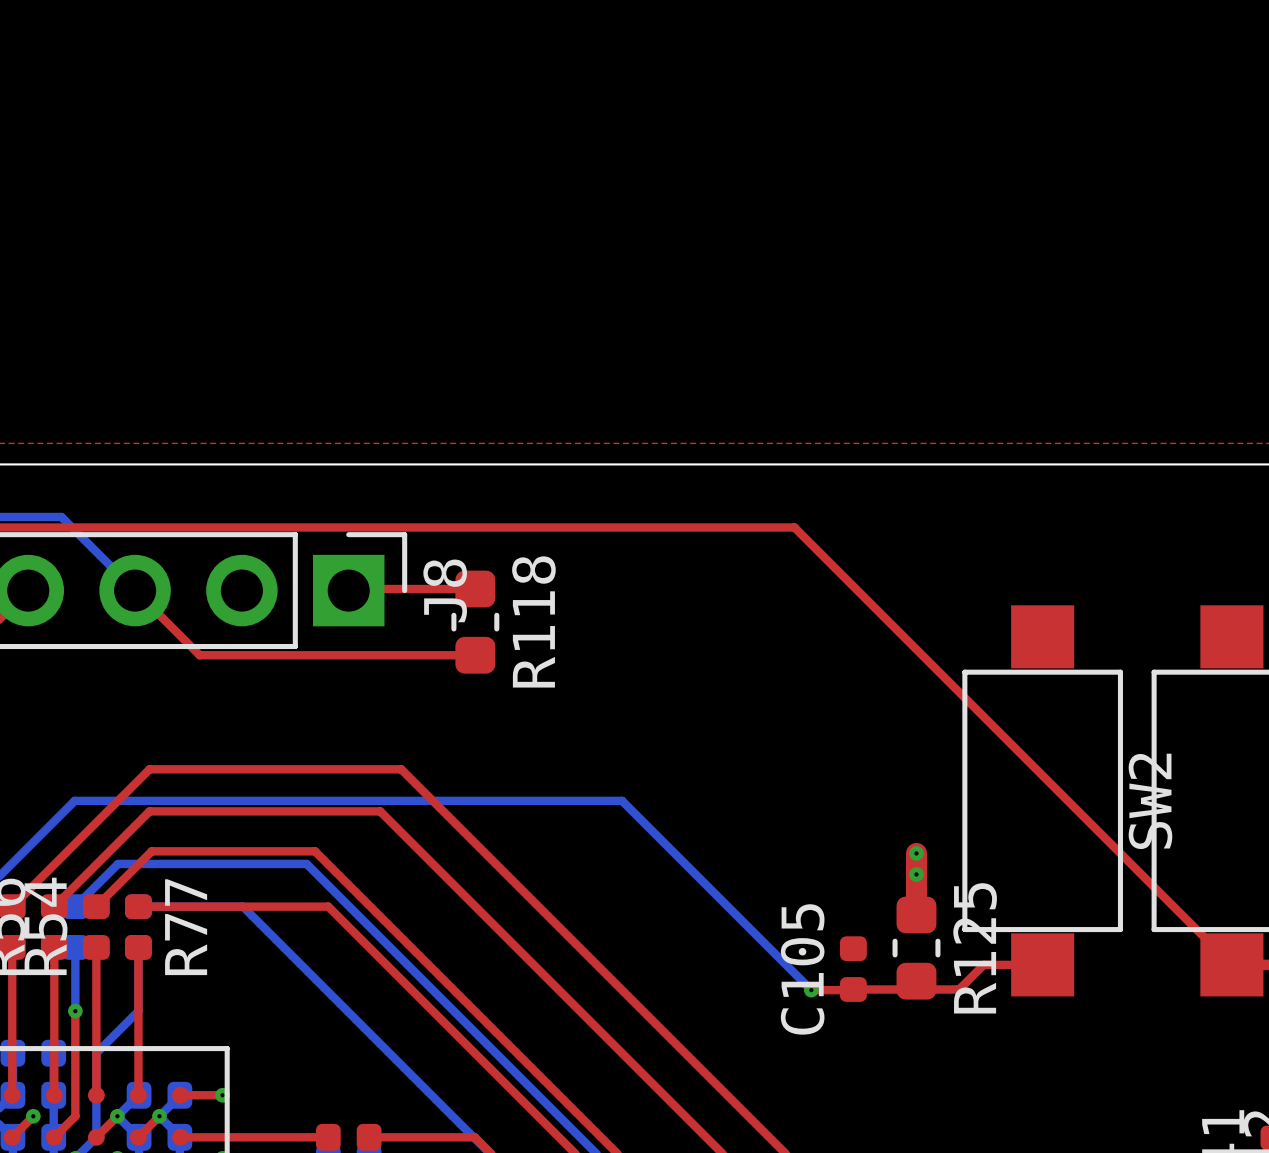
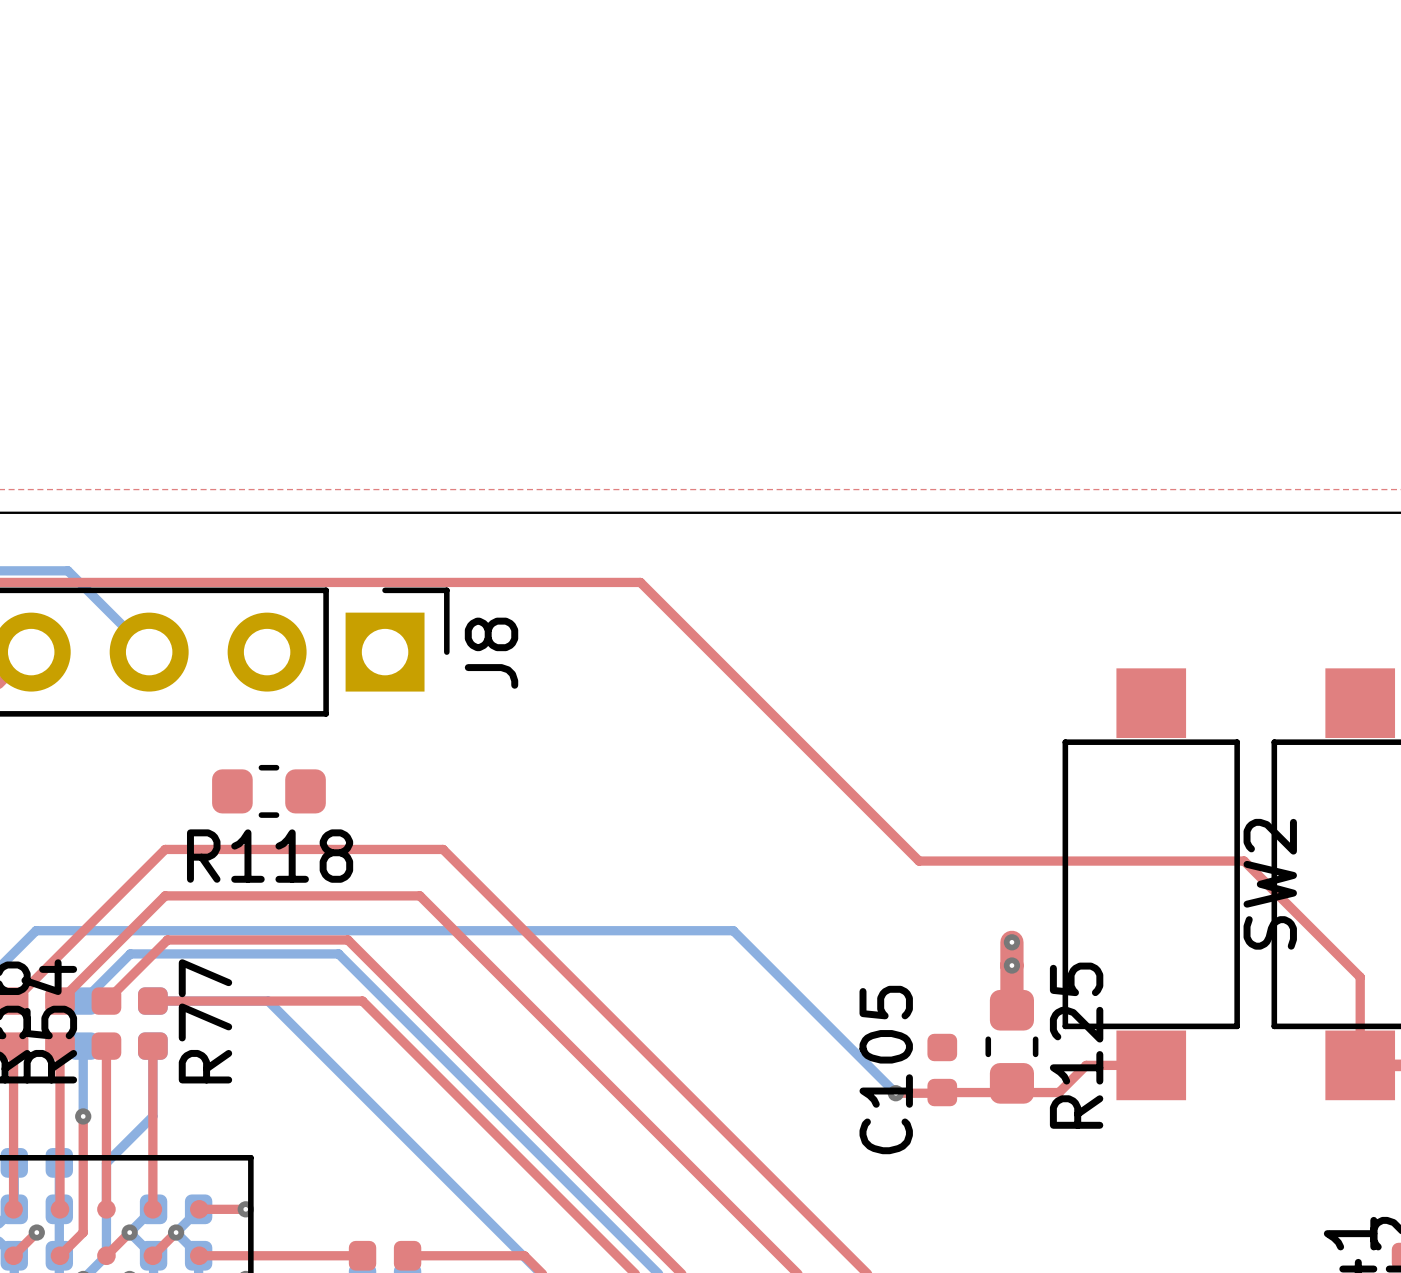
top track: (580, 527) (794, 527) (1231, 964) -> (640, 582) (919, 861) (1244, 861) (1360, 977) (1360, 1065)
top track: (475, 589) (350, 589) (348, 590) -> none
top track: (135, 590) (199, 655) (475, 655) -> none
R118 rotation: 0° (475, 622) -> 90° clockwise (268, 791)
R118 position: (475, 622) -> (268, 791)
bottom track: (32, 842) (74, 800) (622, 800) (664, 842) -> (36, 930) (733, 930)

